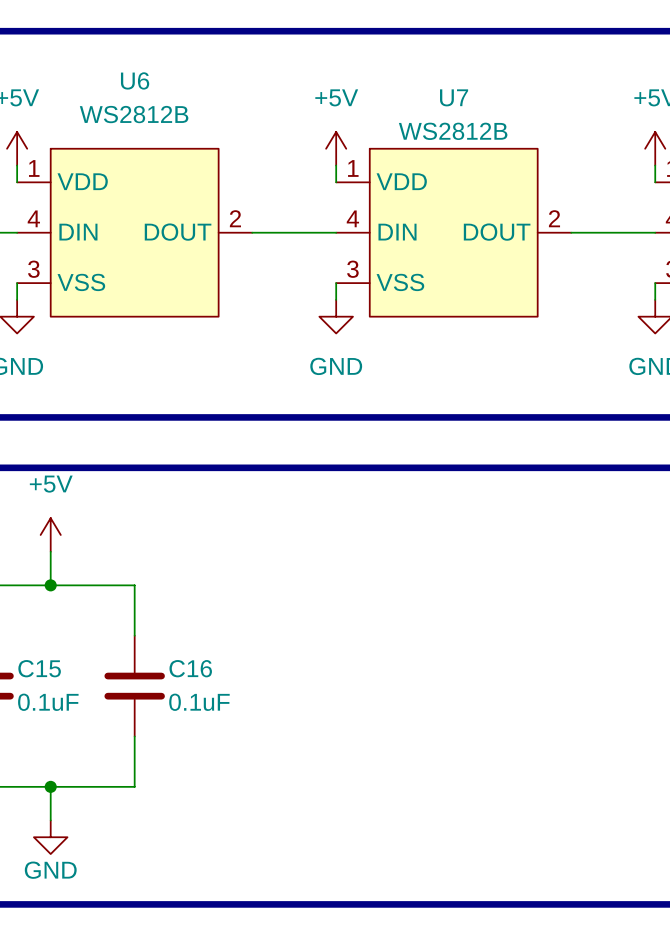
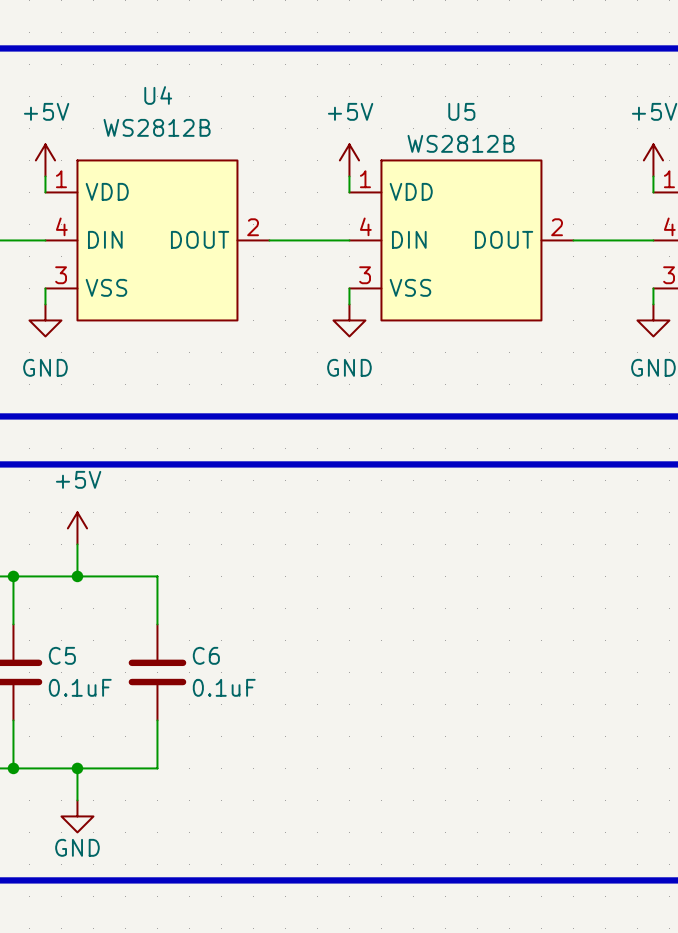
U6 name: U6 (135, 80) -> U4 (158, 95)
U7 name: U7 (454, 97) -> U5 (461, 111)
C15 name: C15 (39, 668) -> C5 (62, 655)
C16 name: C16 (190, 668) -> C6 (206, 655)

